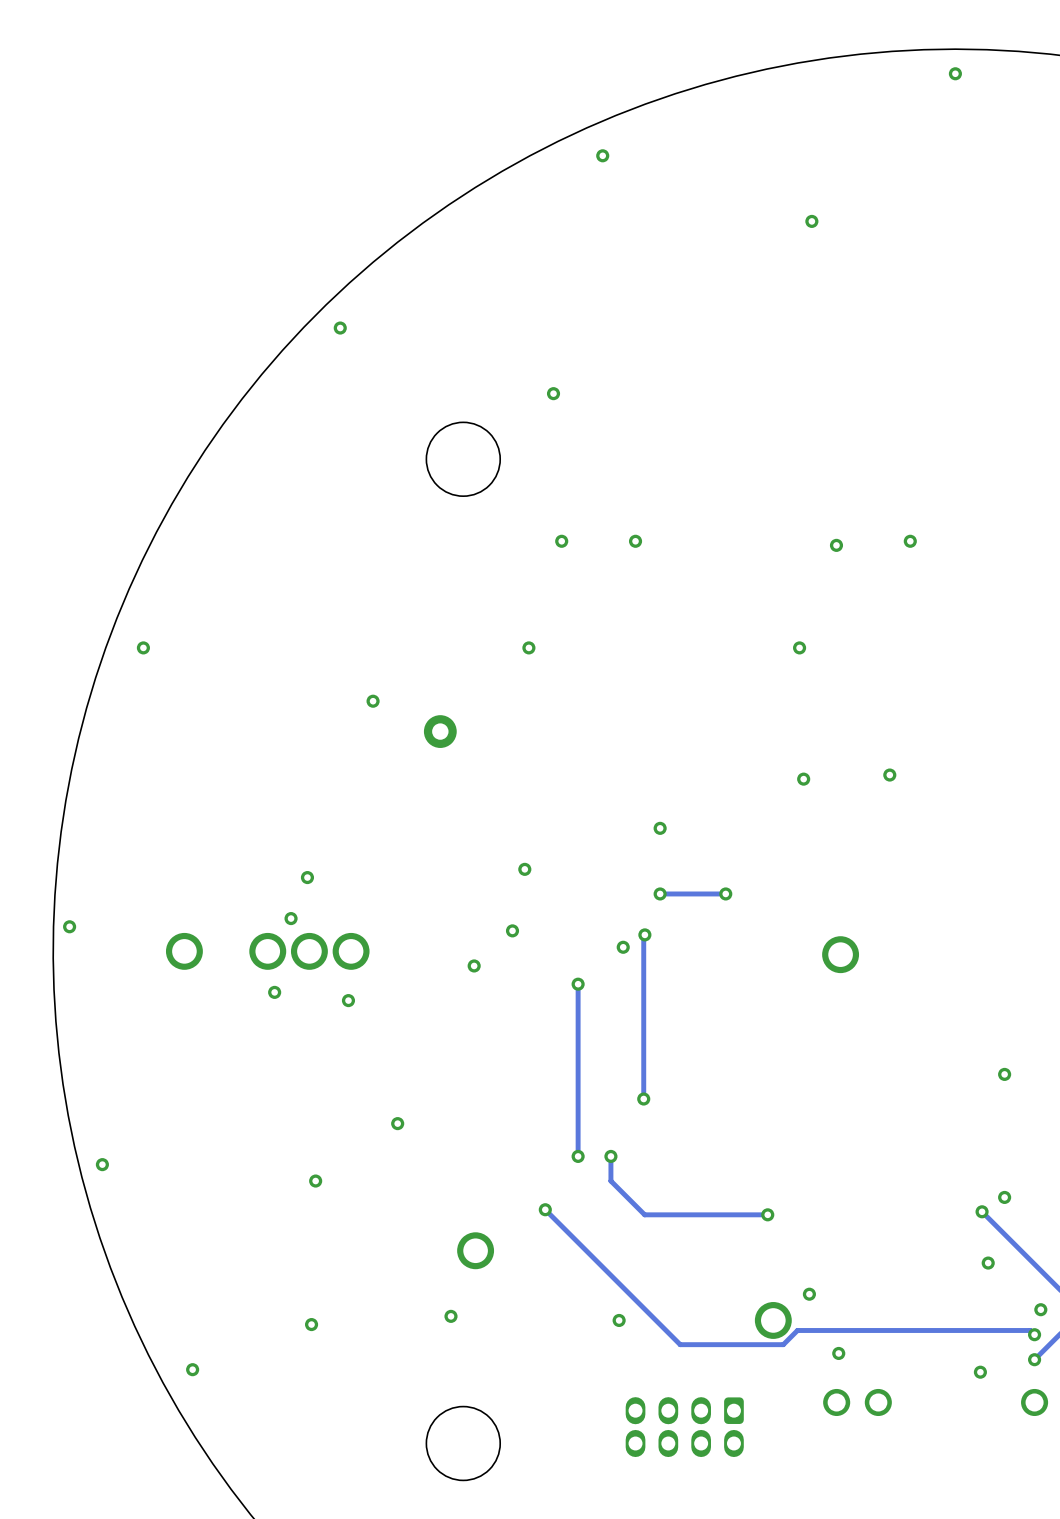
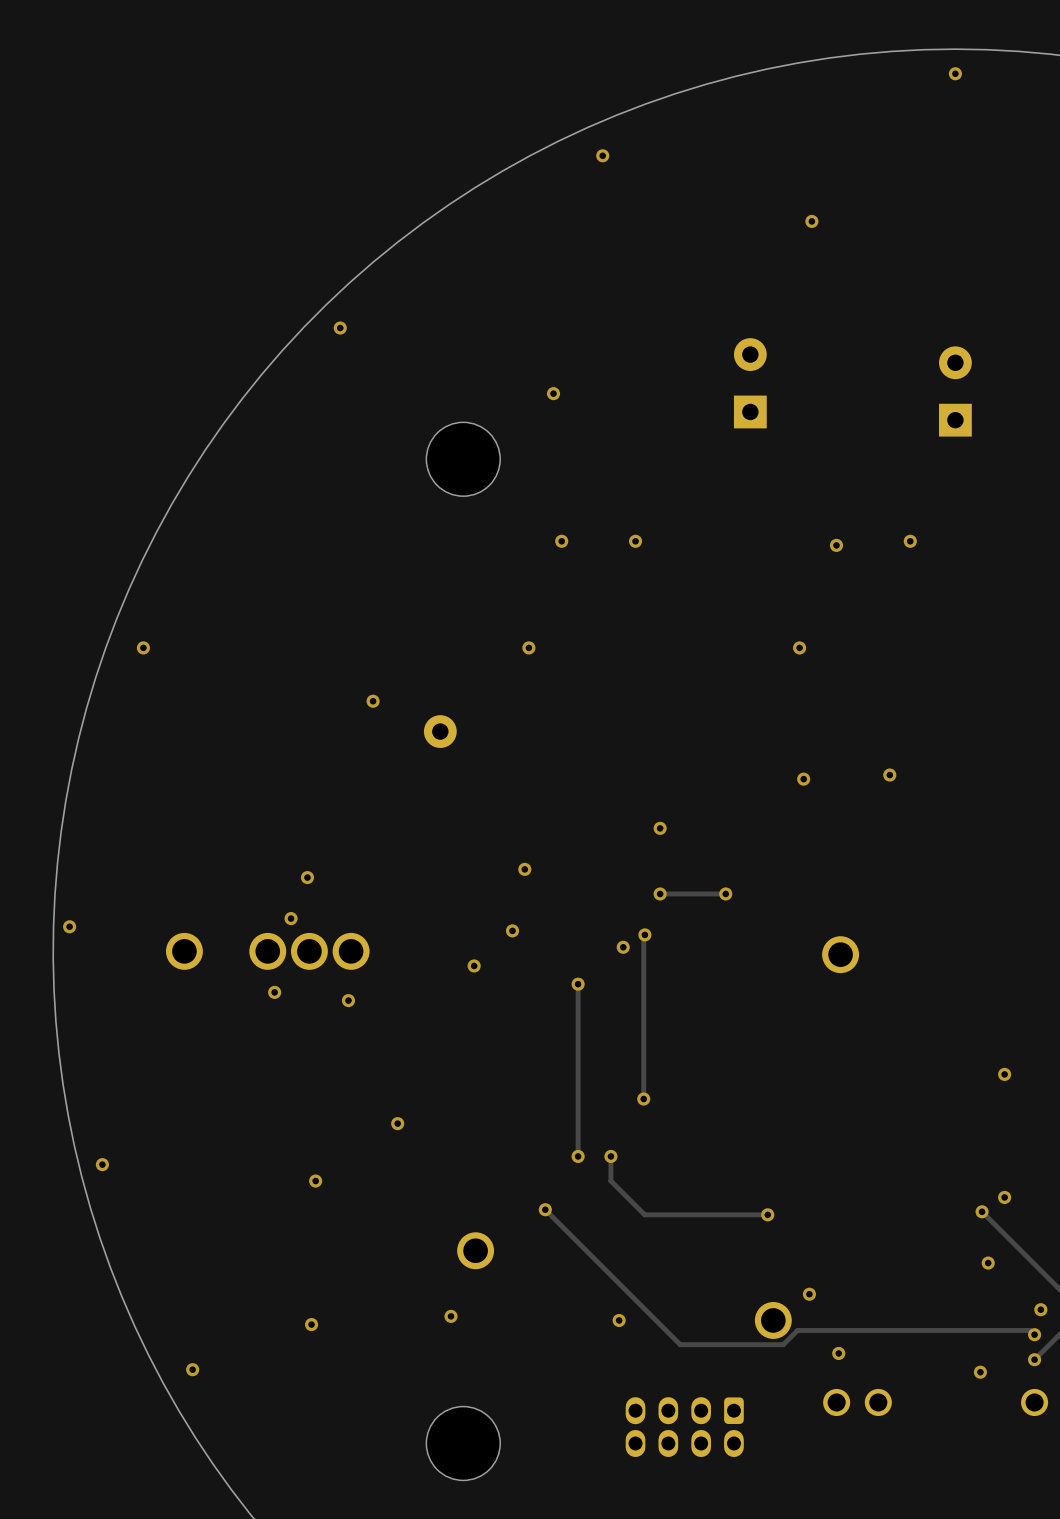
part: none -> (750, 383)
part: none -> (955, 391)

